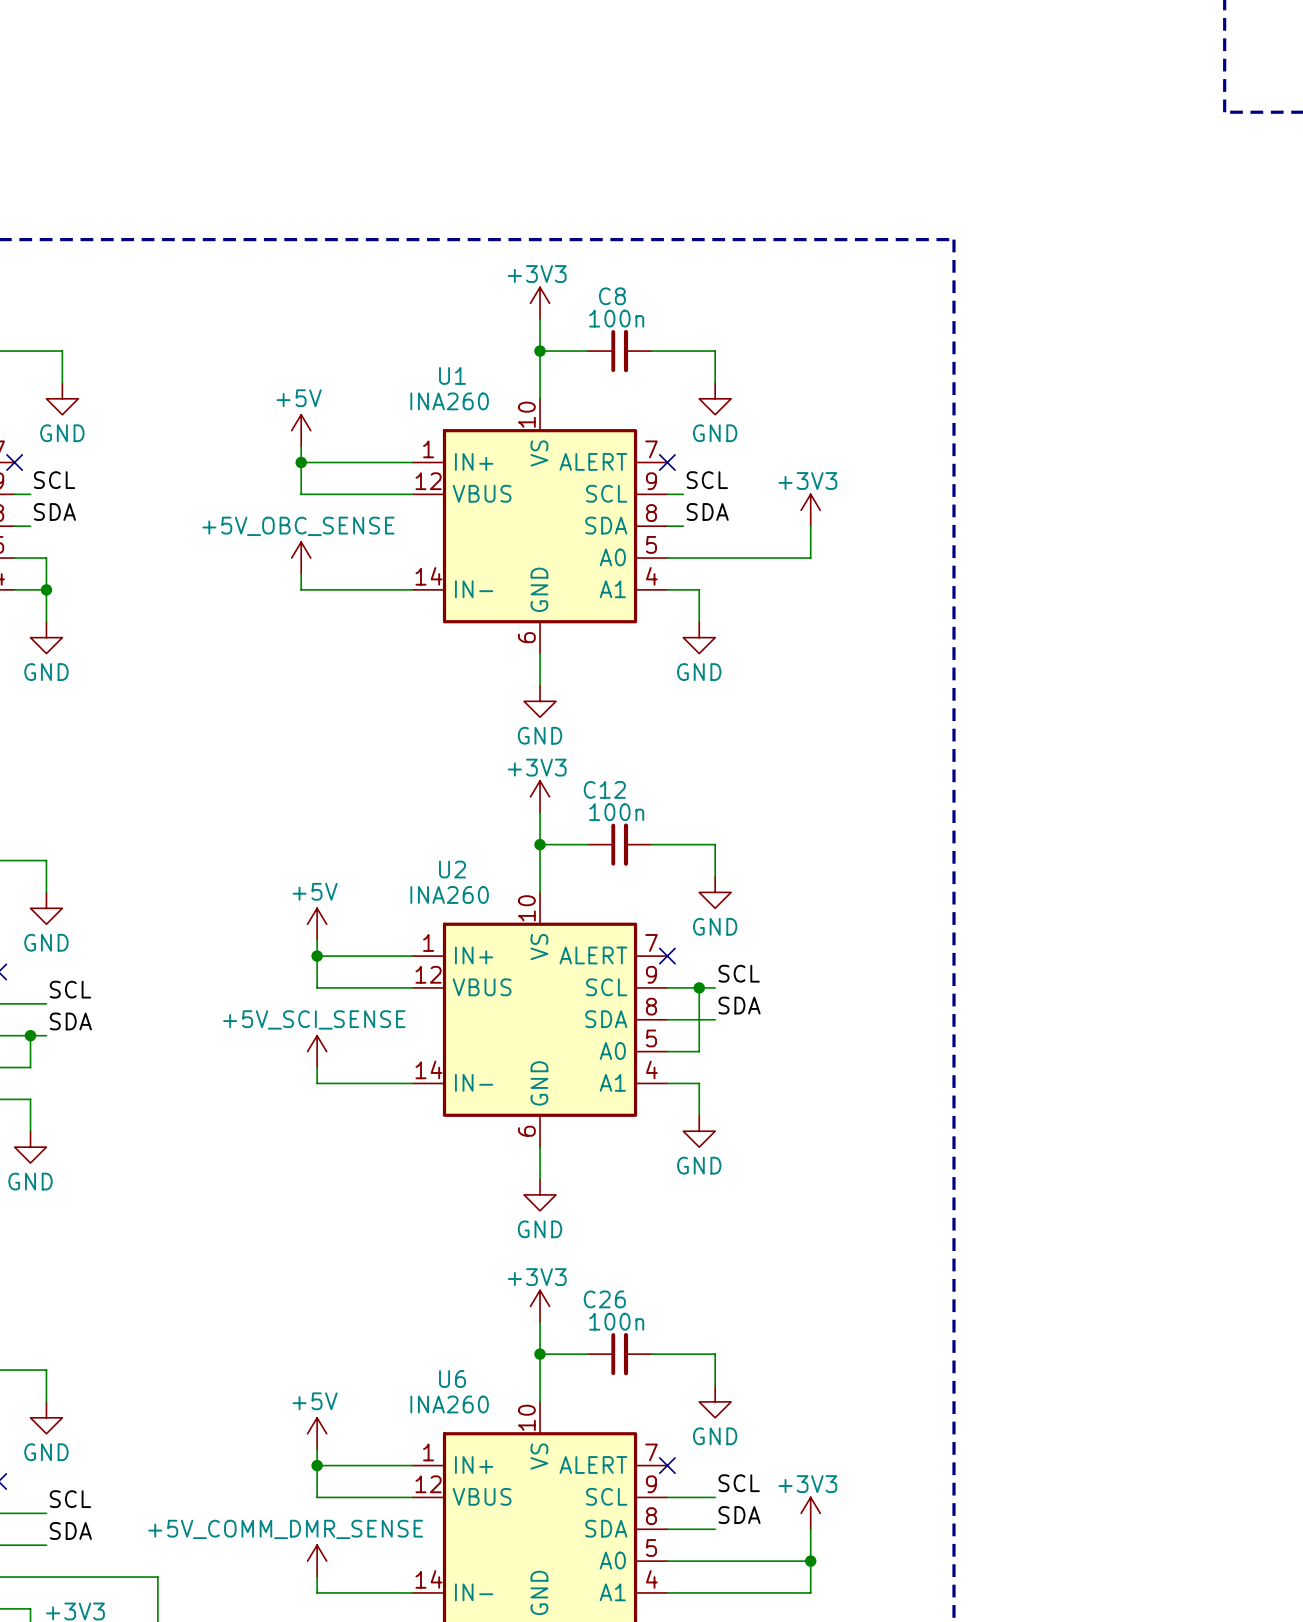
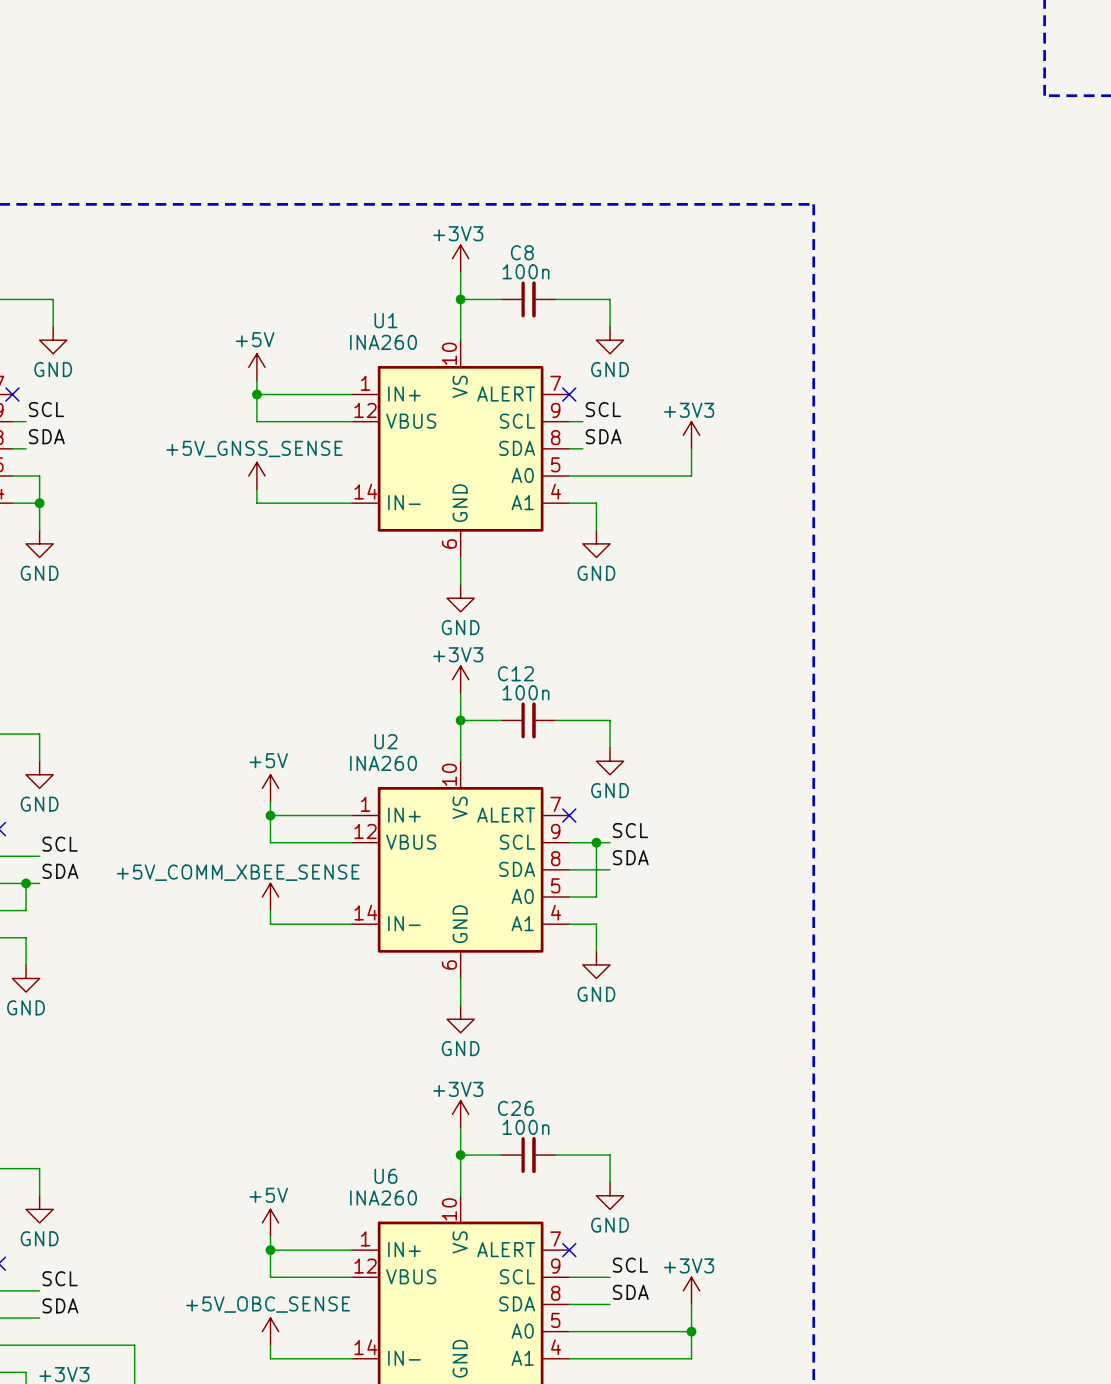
power symbol: +5V_OBC_SENSE (301, 558) -> +5V_GNSS_SENSE (256, 475)
power symbol: +5V_SCI_SENSE (317, 1051) -> +5V_COMM_XBEE_SENSE (270, 897)
power symbol: +5V_COMM_DMR_SENSE (317, 1561) -> +5V_OBC_SENSE (270, 1331)

